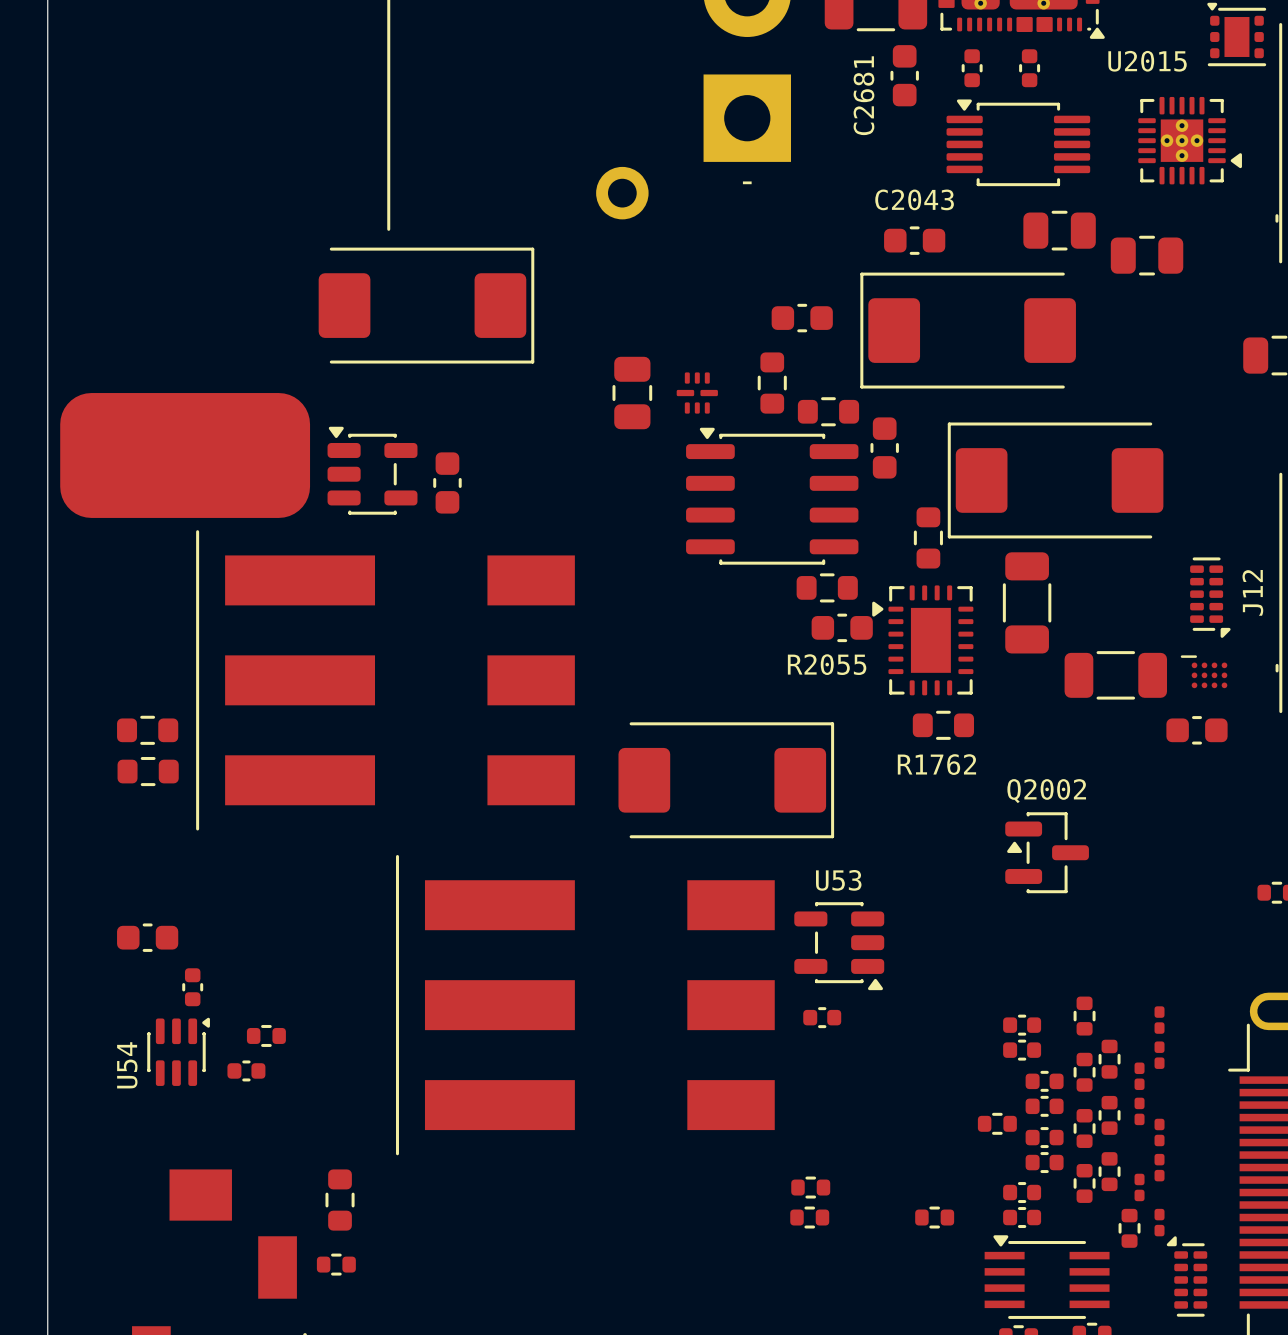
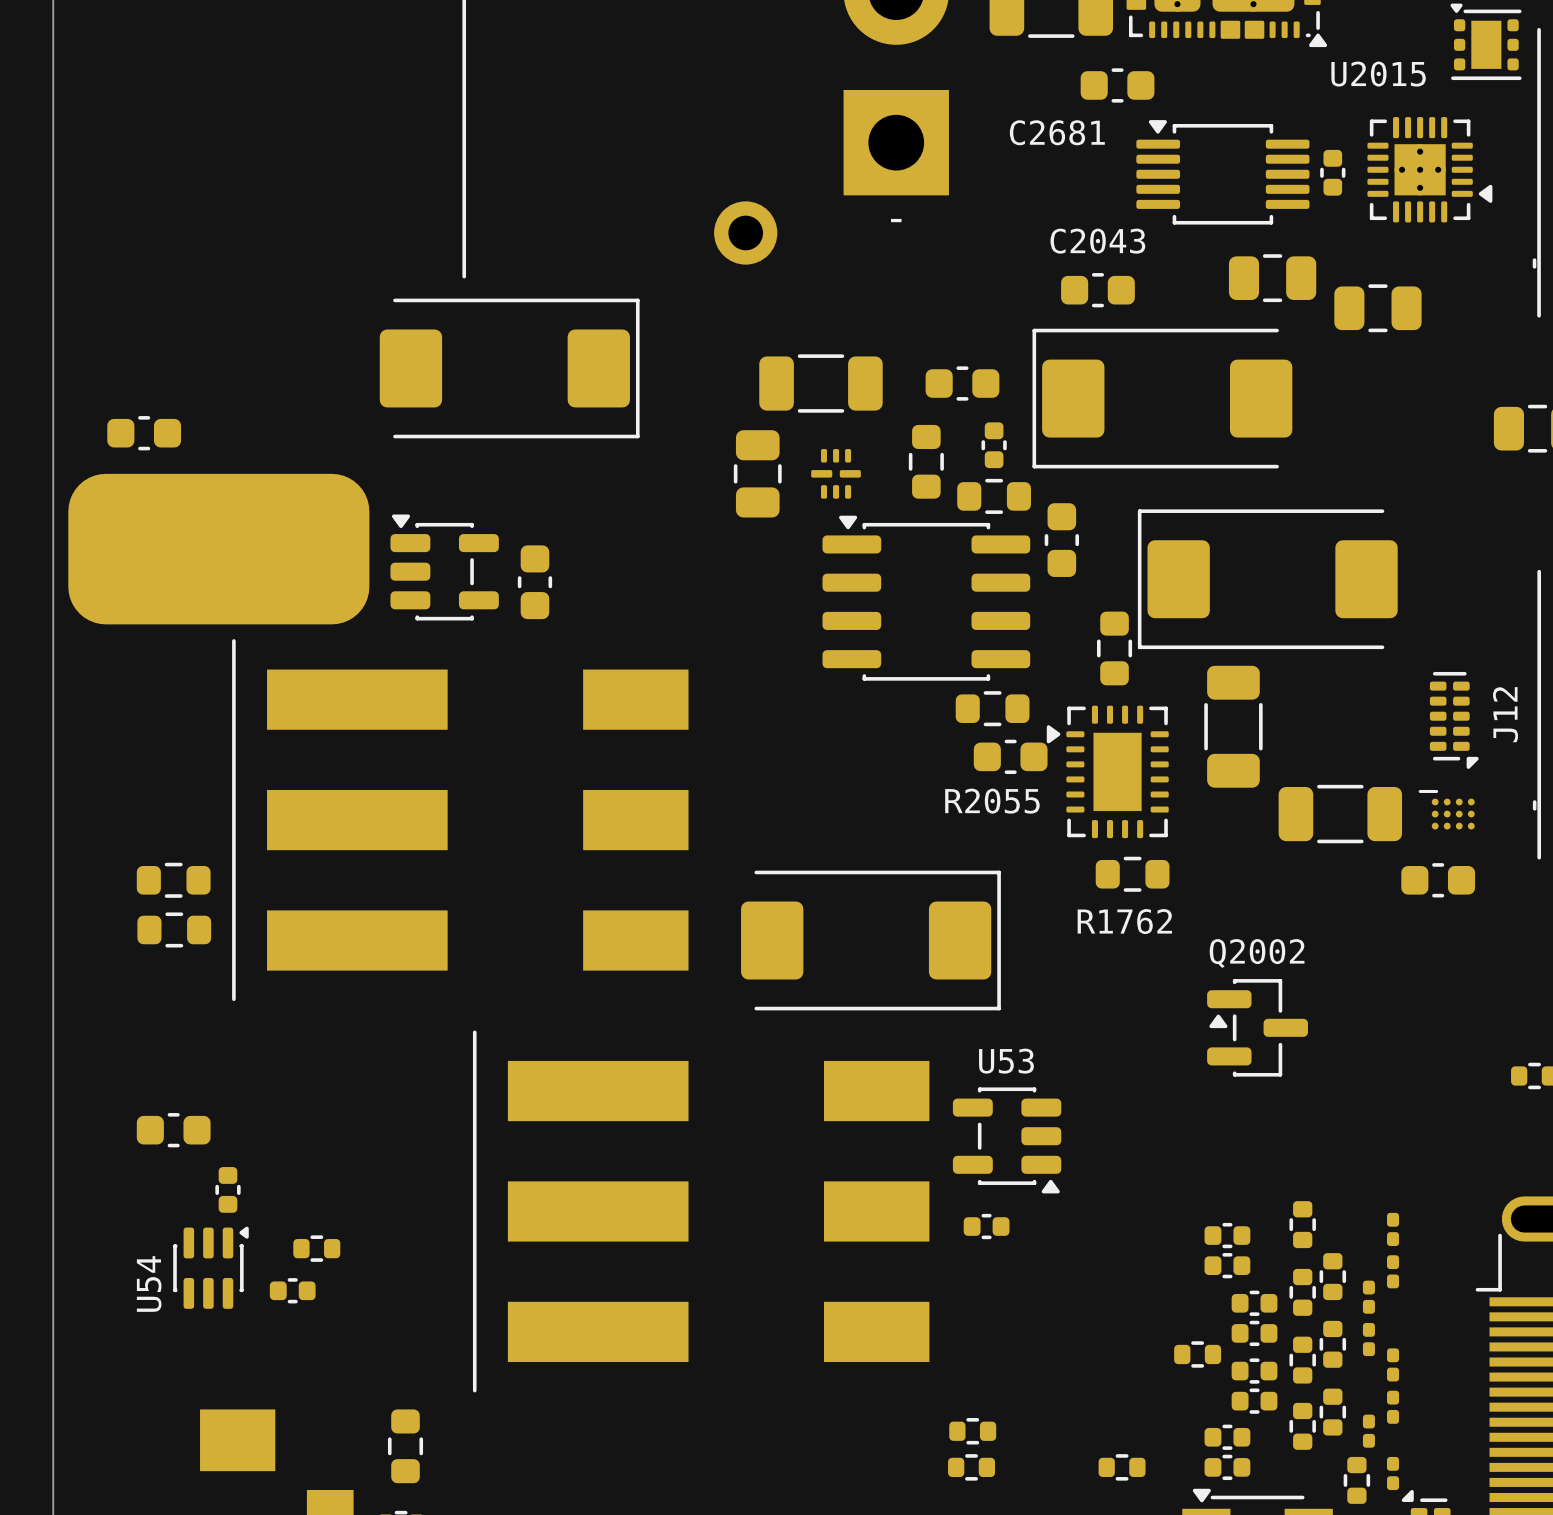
part: (972, 68) -> none
part: (1029, 68) -> none
C2681 rotation: 0° (904, 75) -> 90° clockwise (1117, 85)
part: none -> (1332, 172)
part: none -> (820, 383)
part: none -> (144, 433)
part: none -> (994, 445)

